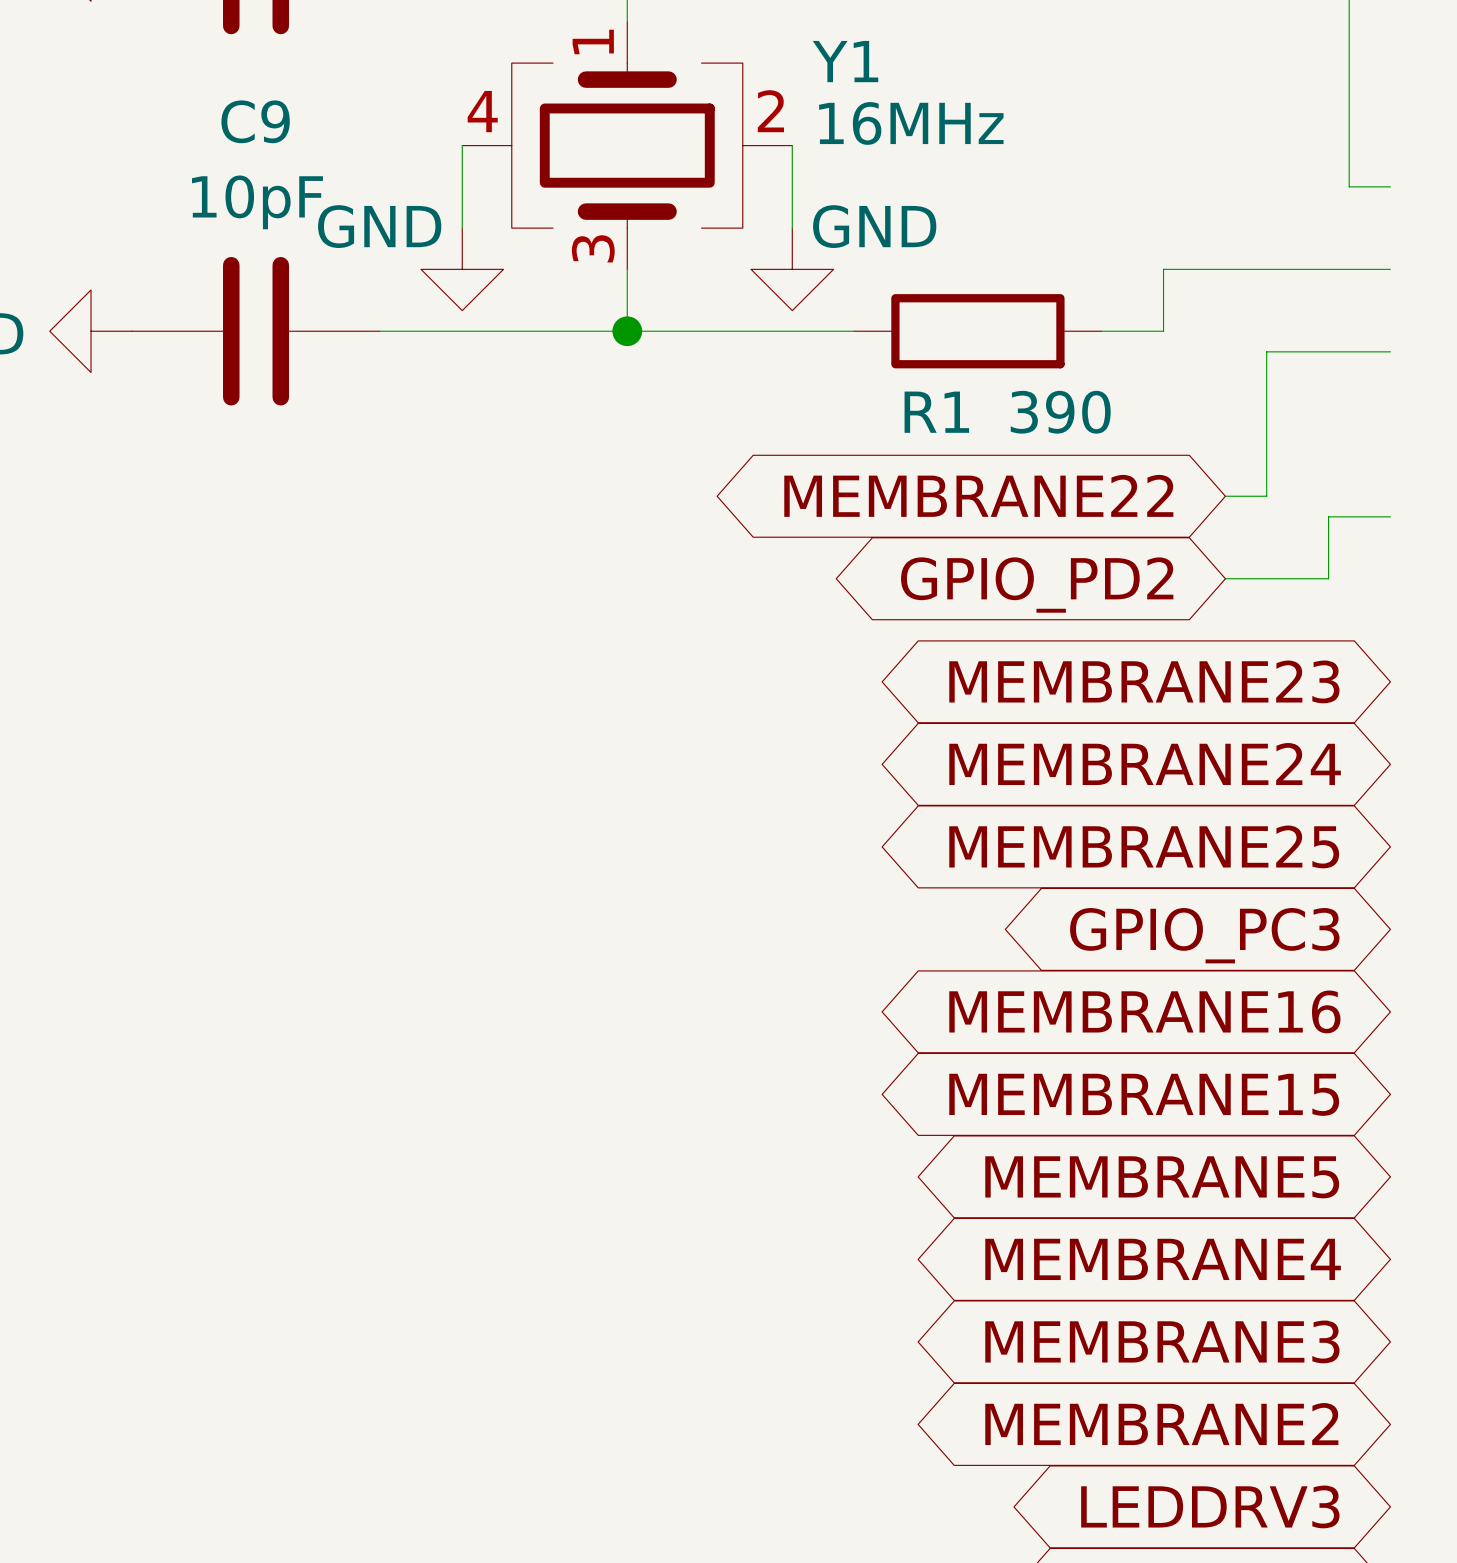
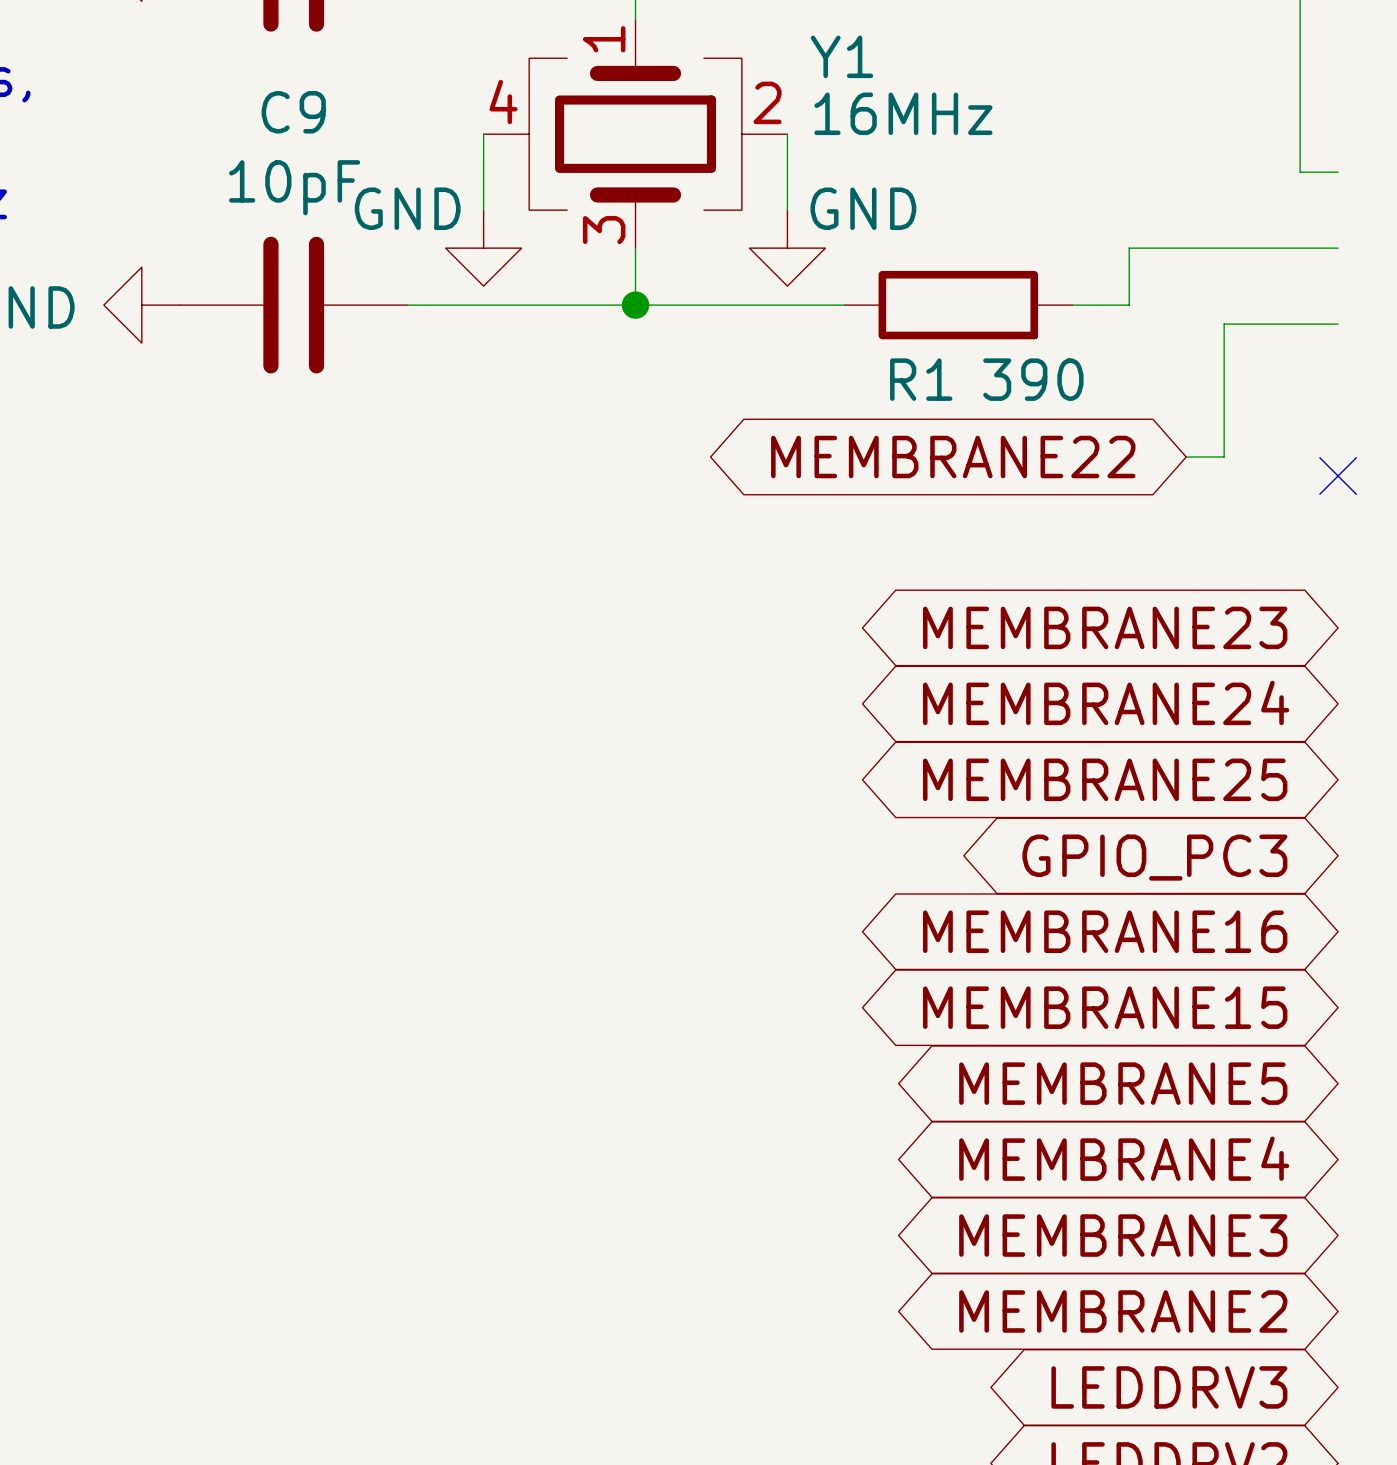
wire: (1390, 516) (1328, 516) (1328, 578) (1225, 578) -> none
no-connect mark: none -> (1338, 476)
global label: GPIO_PD2 (1037, 585) -> none

